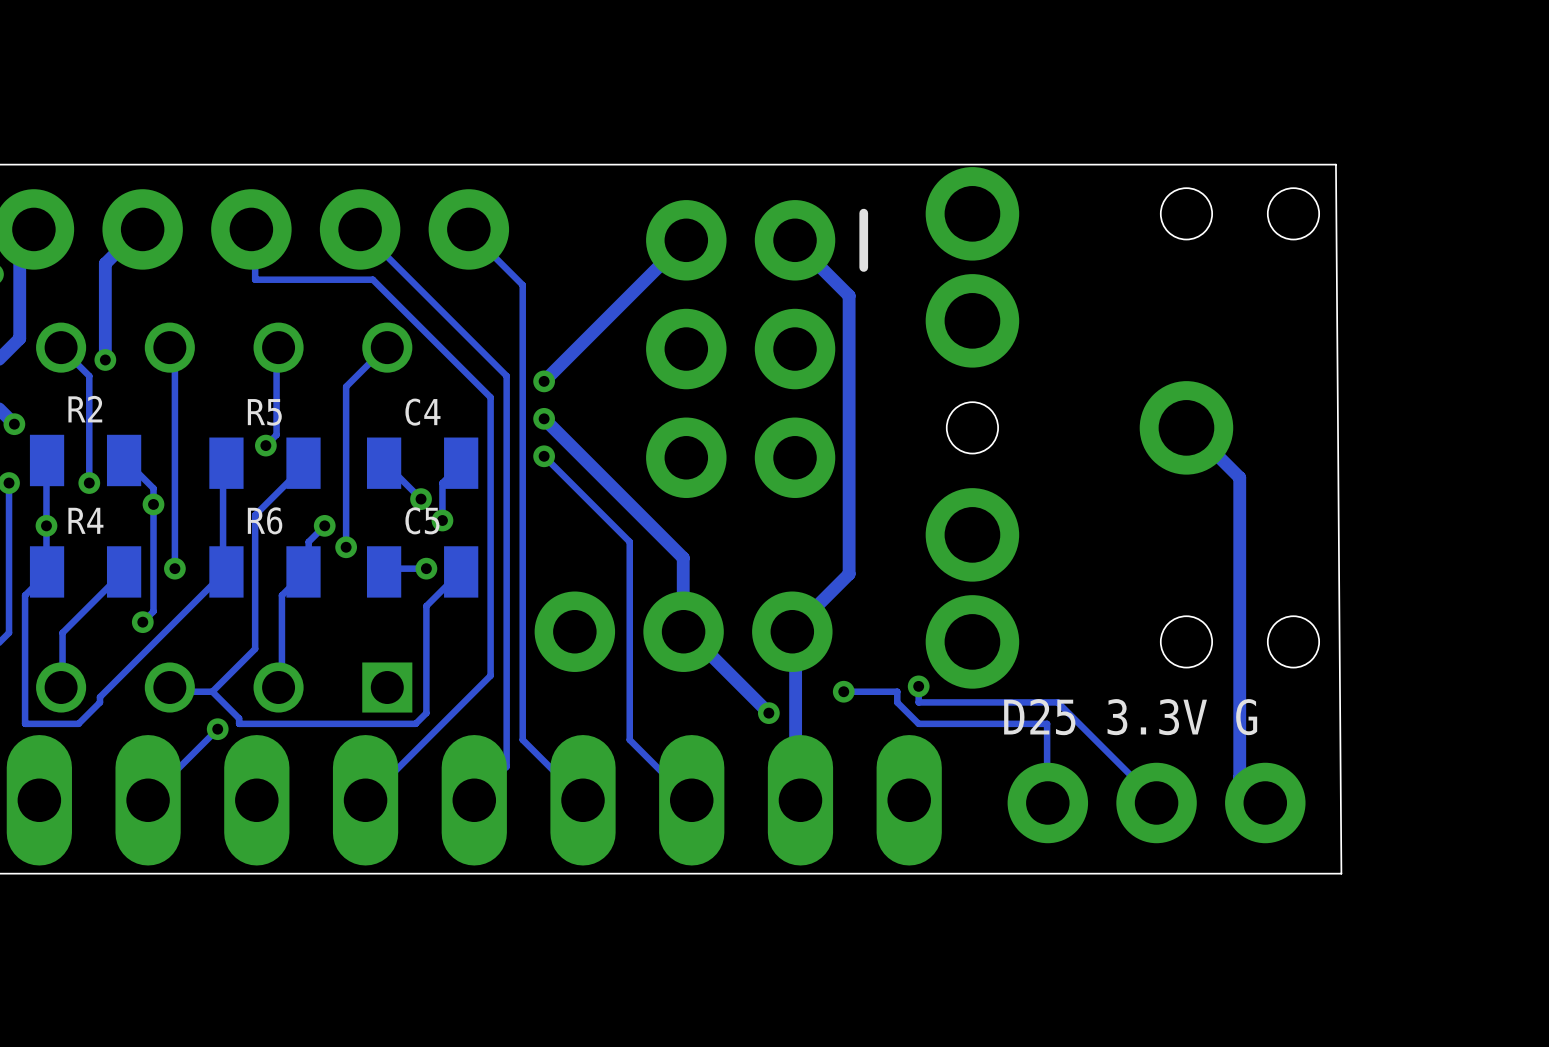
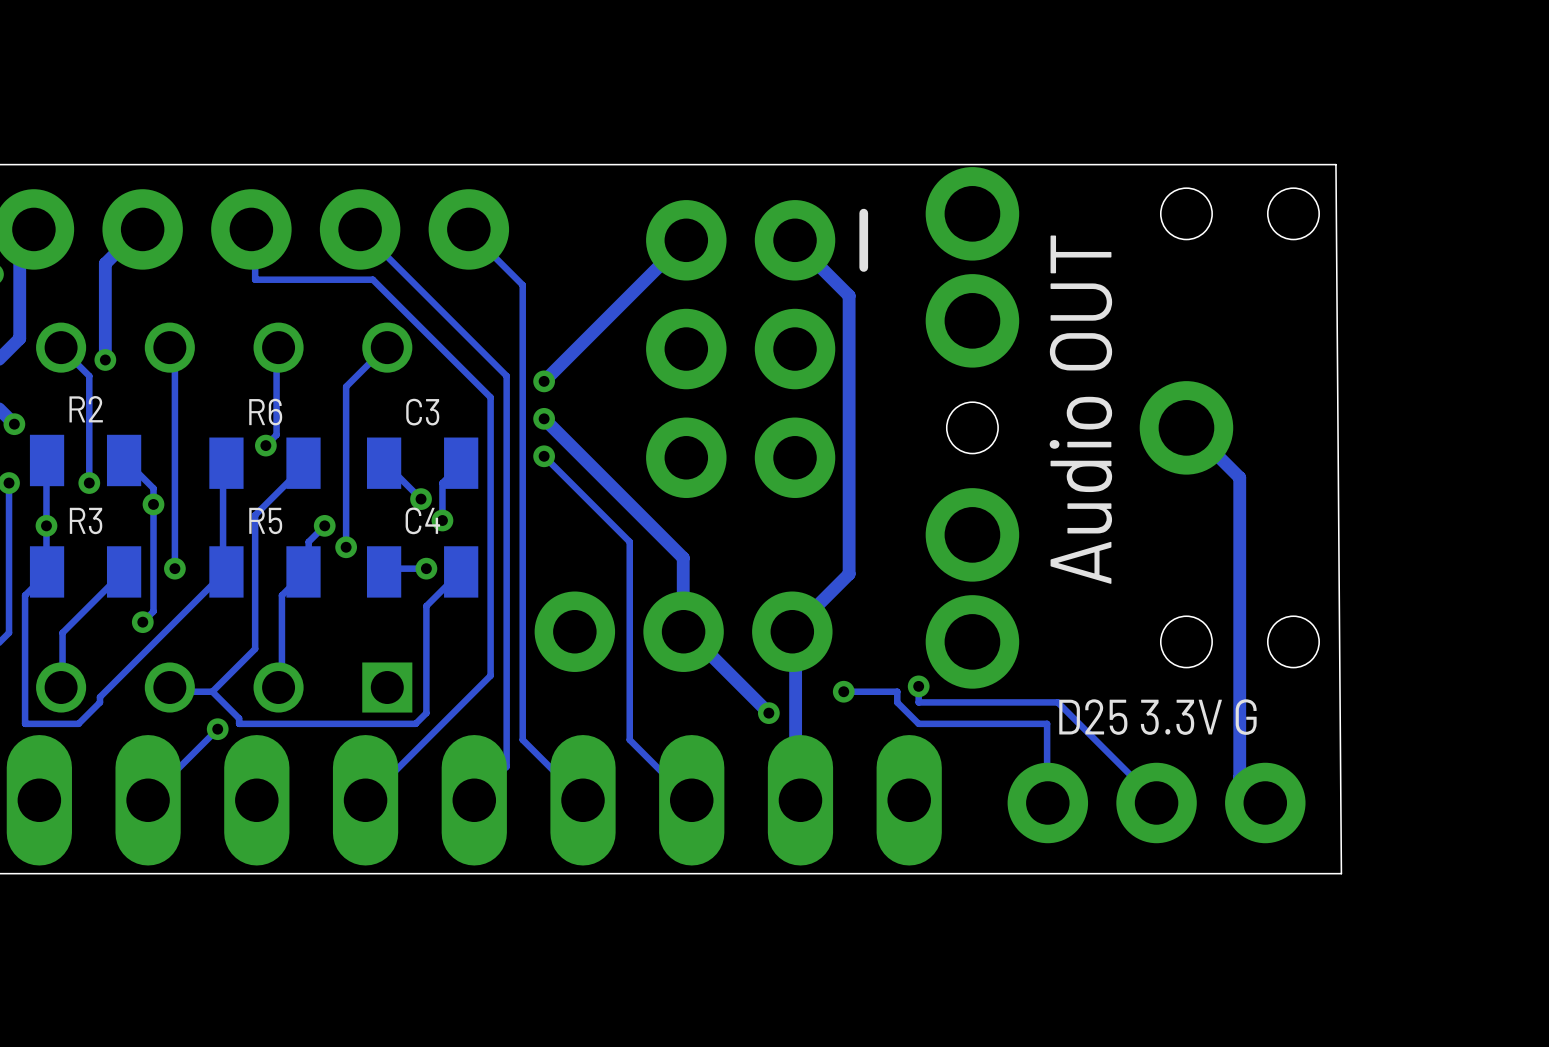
R5 name: R5 (264, 412) -> R6 (265, 412)
C4 name: C4 (422, 412) -> C3 (422, 412)
text: none -> Audio OUT (1080, 409)
R4 name: R4 (85, 520) -> R3 (86, 520)
R6 name: R6 (265, 520) -> R5 (265, 520)
C5 name: C5 (422, 520) -> C4 (422, 520)

